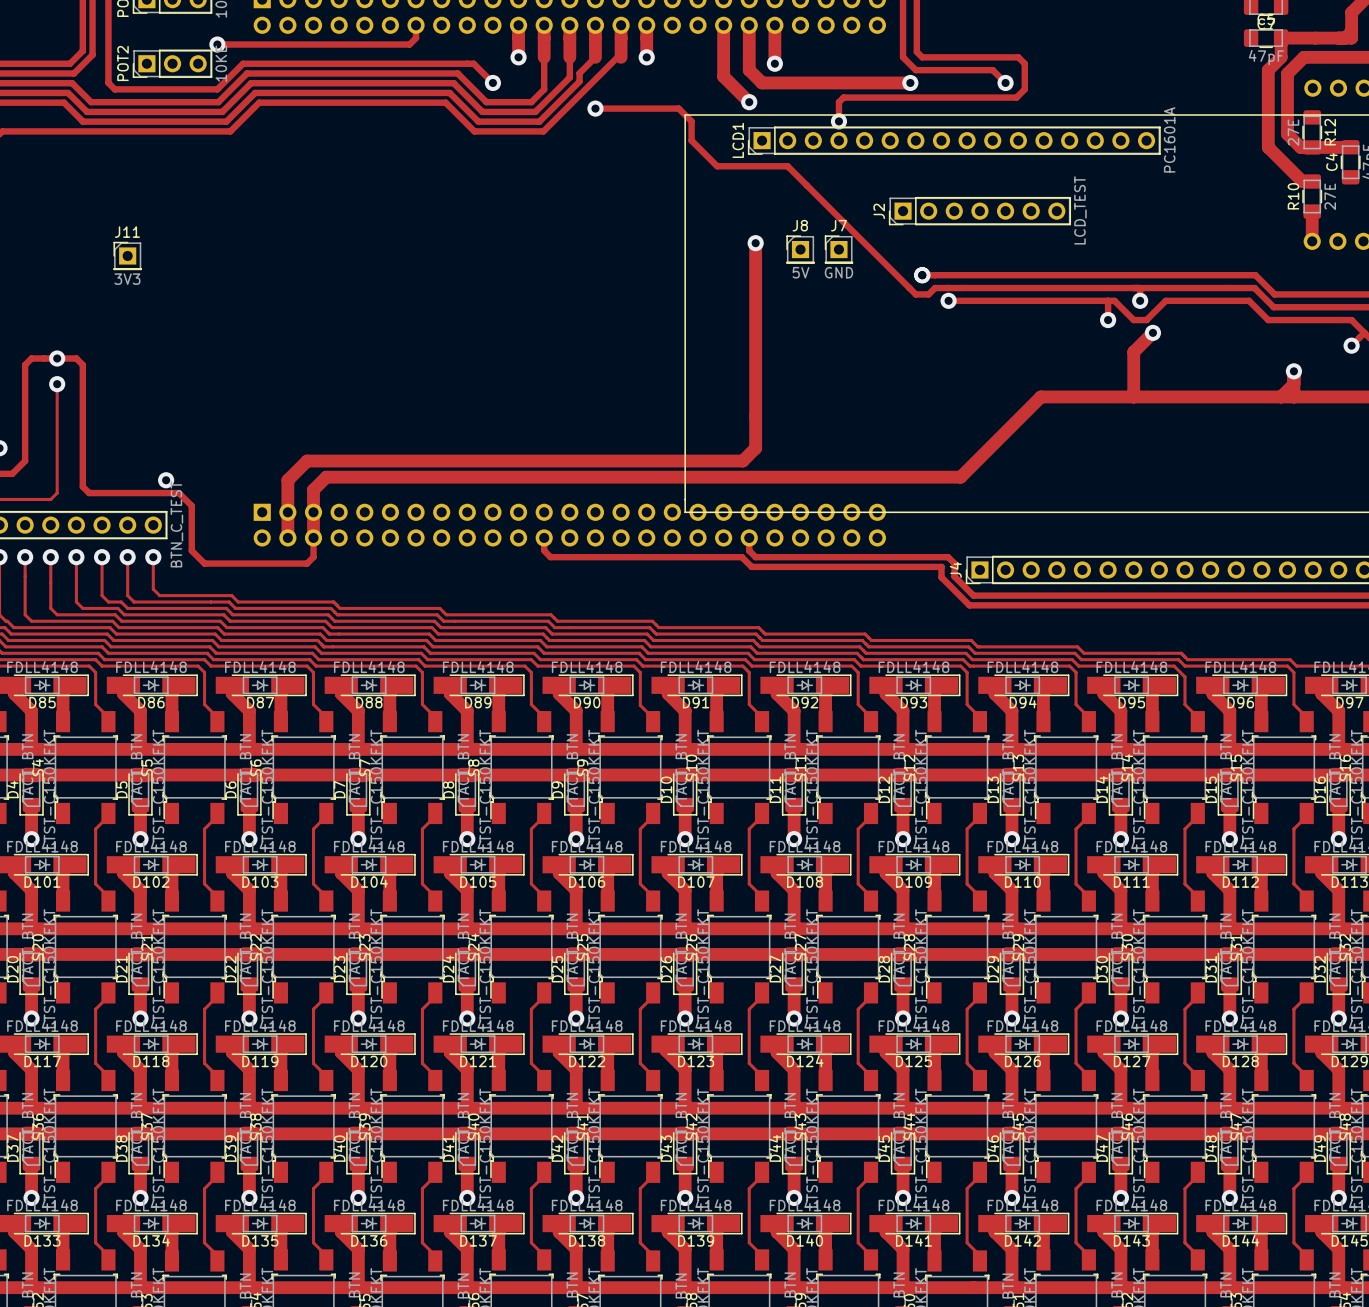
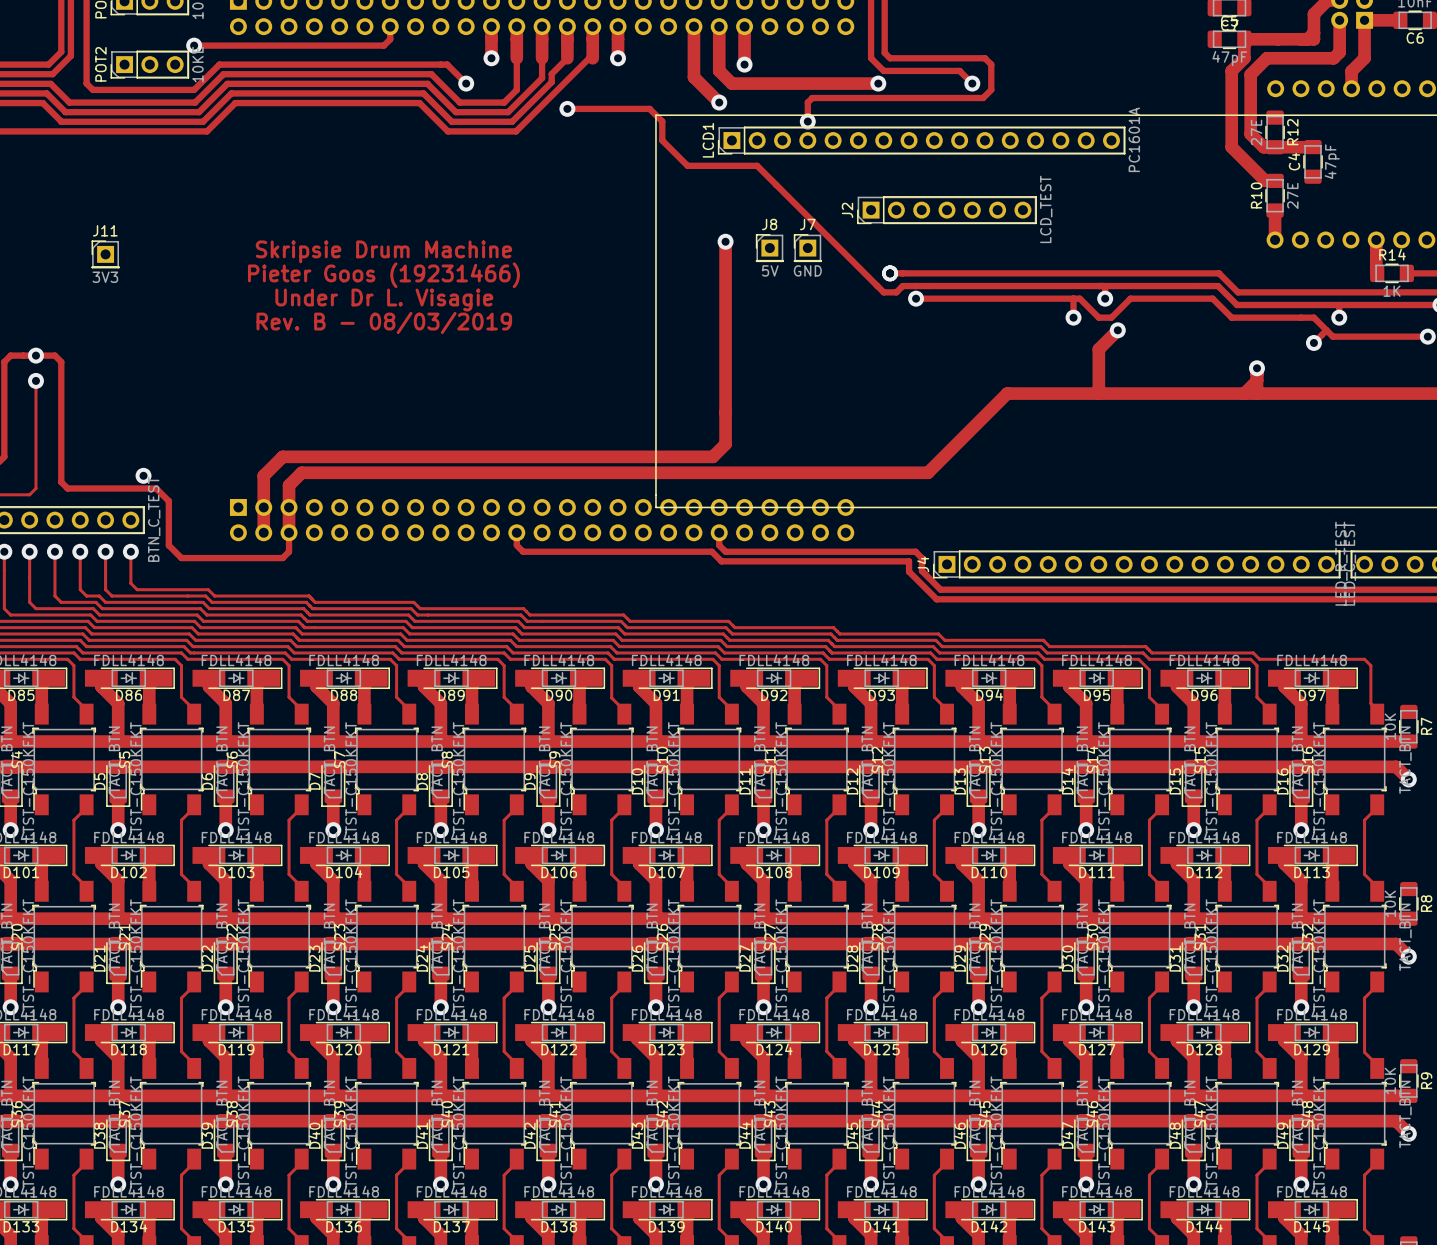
text: none -> Skripsie Drum Machine (383, 251)
text: none -> Pieter Goos (19231466) (383, 275)
text: none -> Under Dr L. Visagie (384, 299)
text: none -> Rev. B - 08/03/2019 (384, 322)

